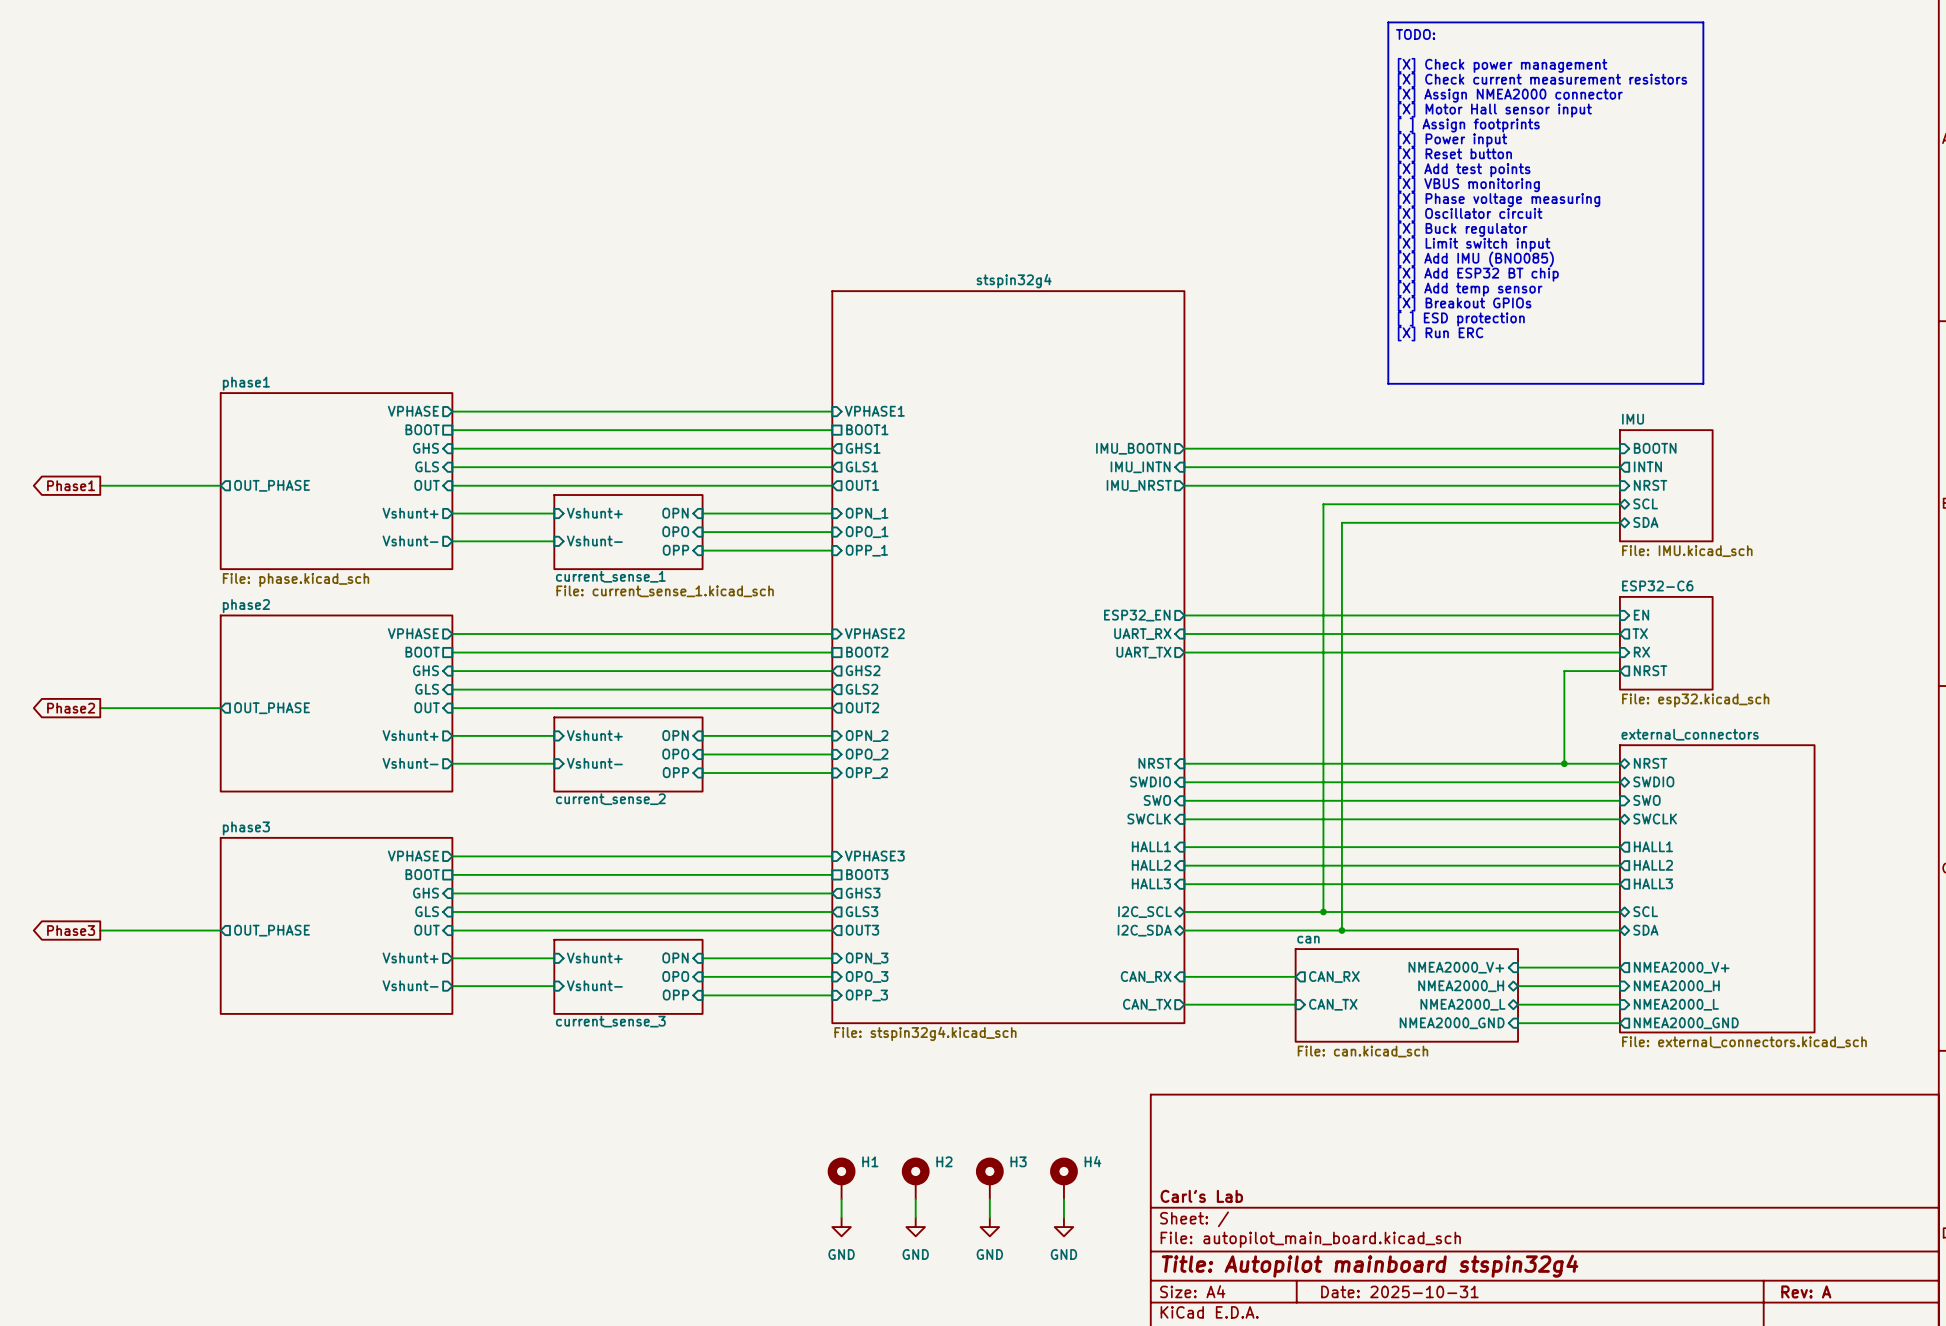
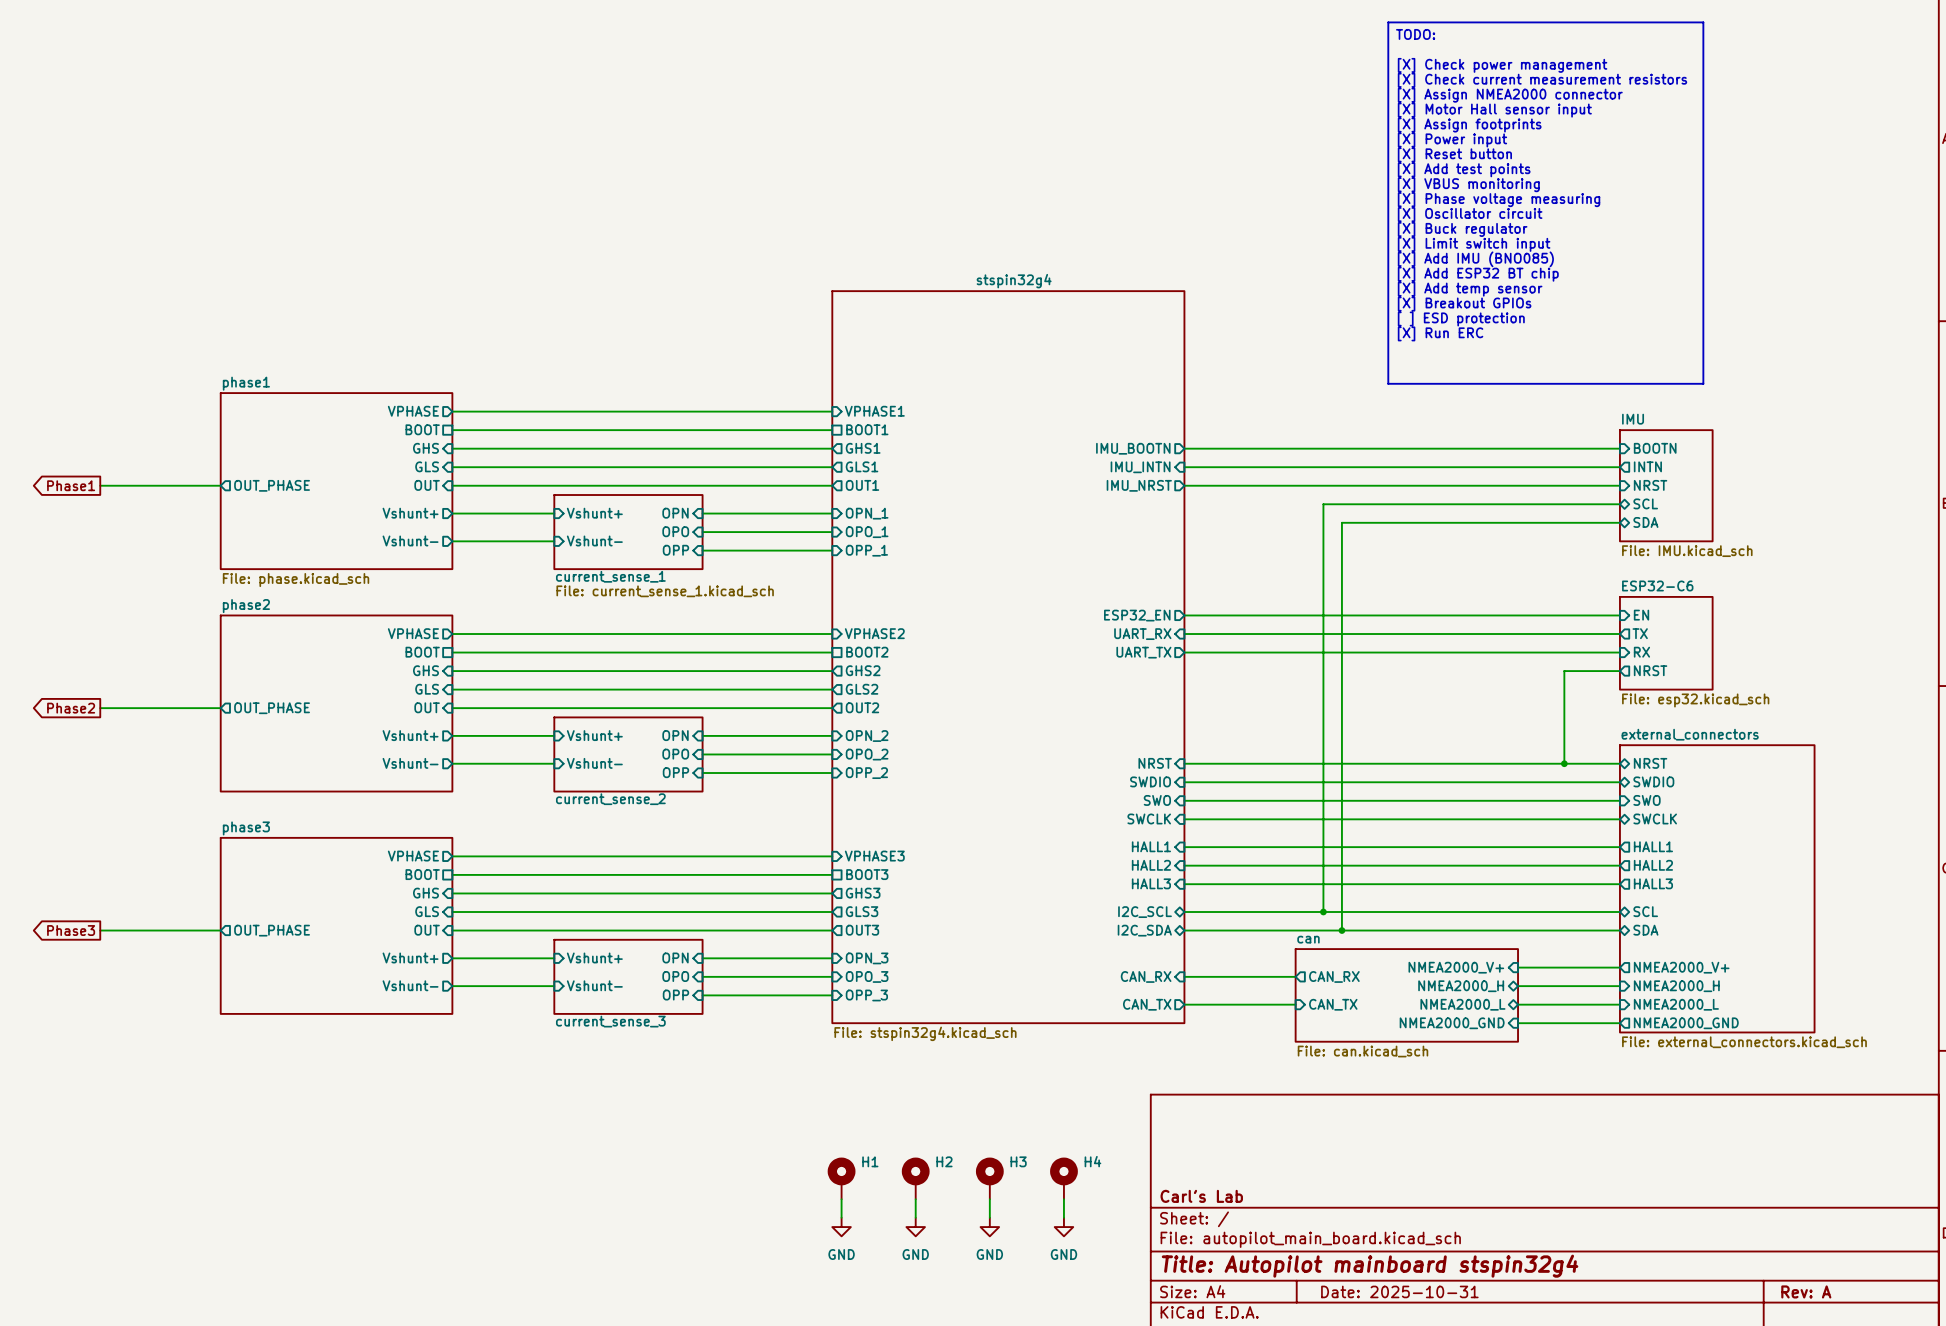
text: [ ] Assign footprints (1468, 125) -> [X] Assign footprints (1469, 125)

